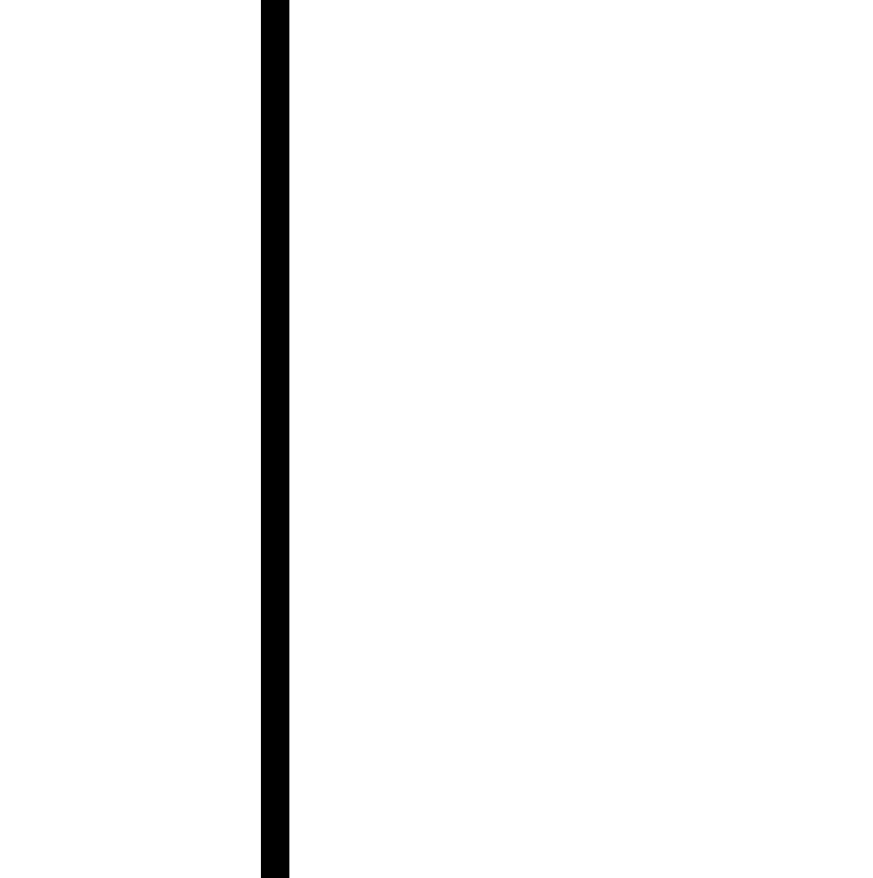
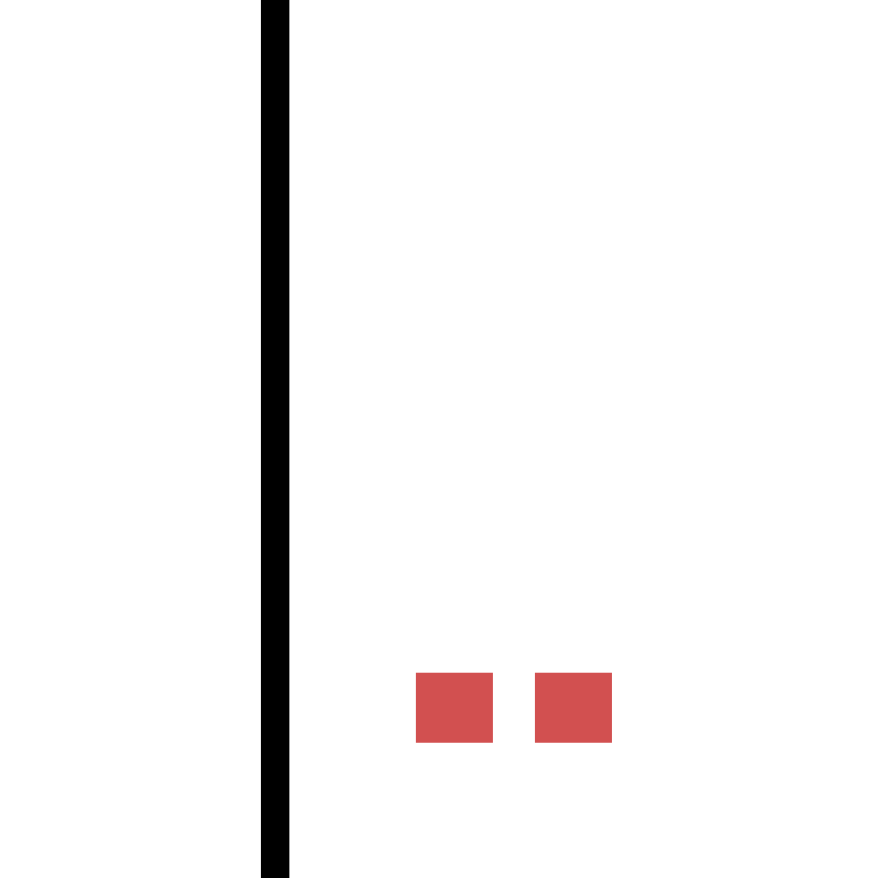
part: none -> (513, 707)

